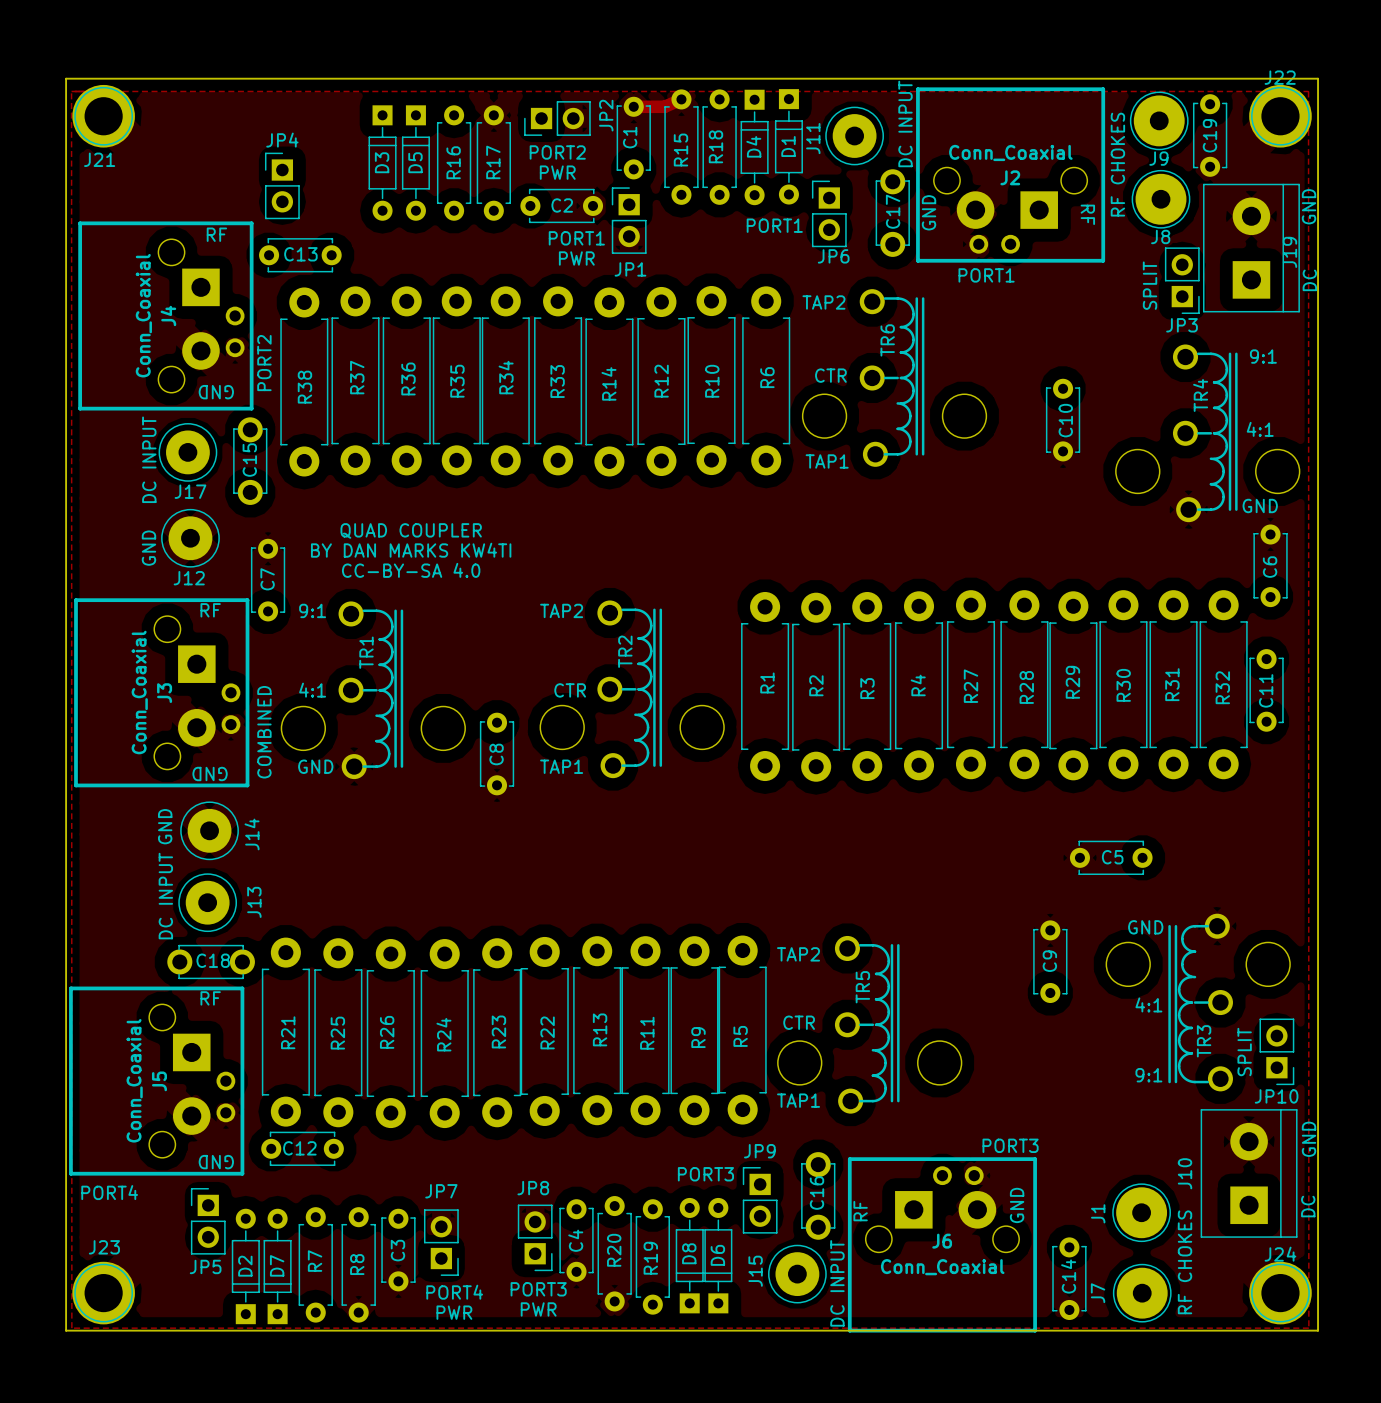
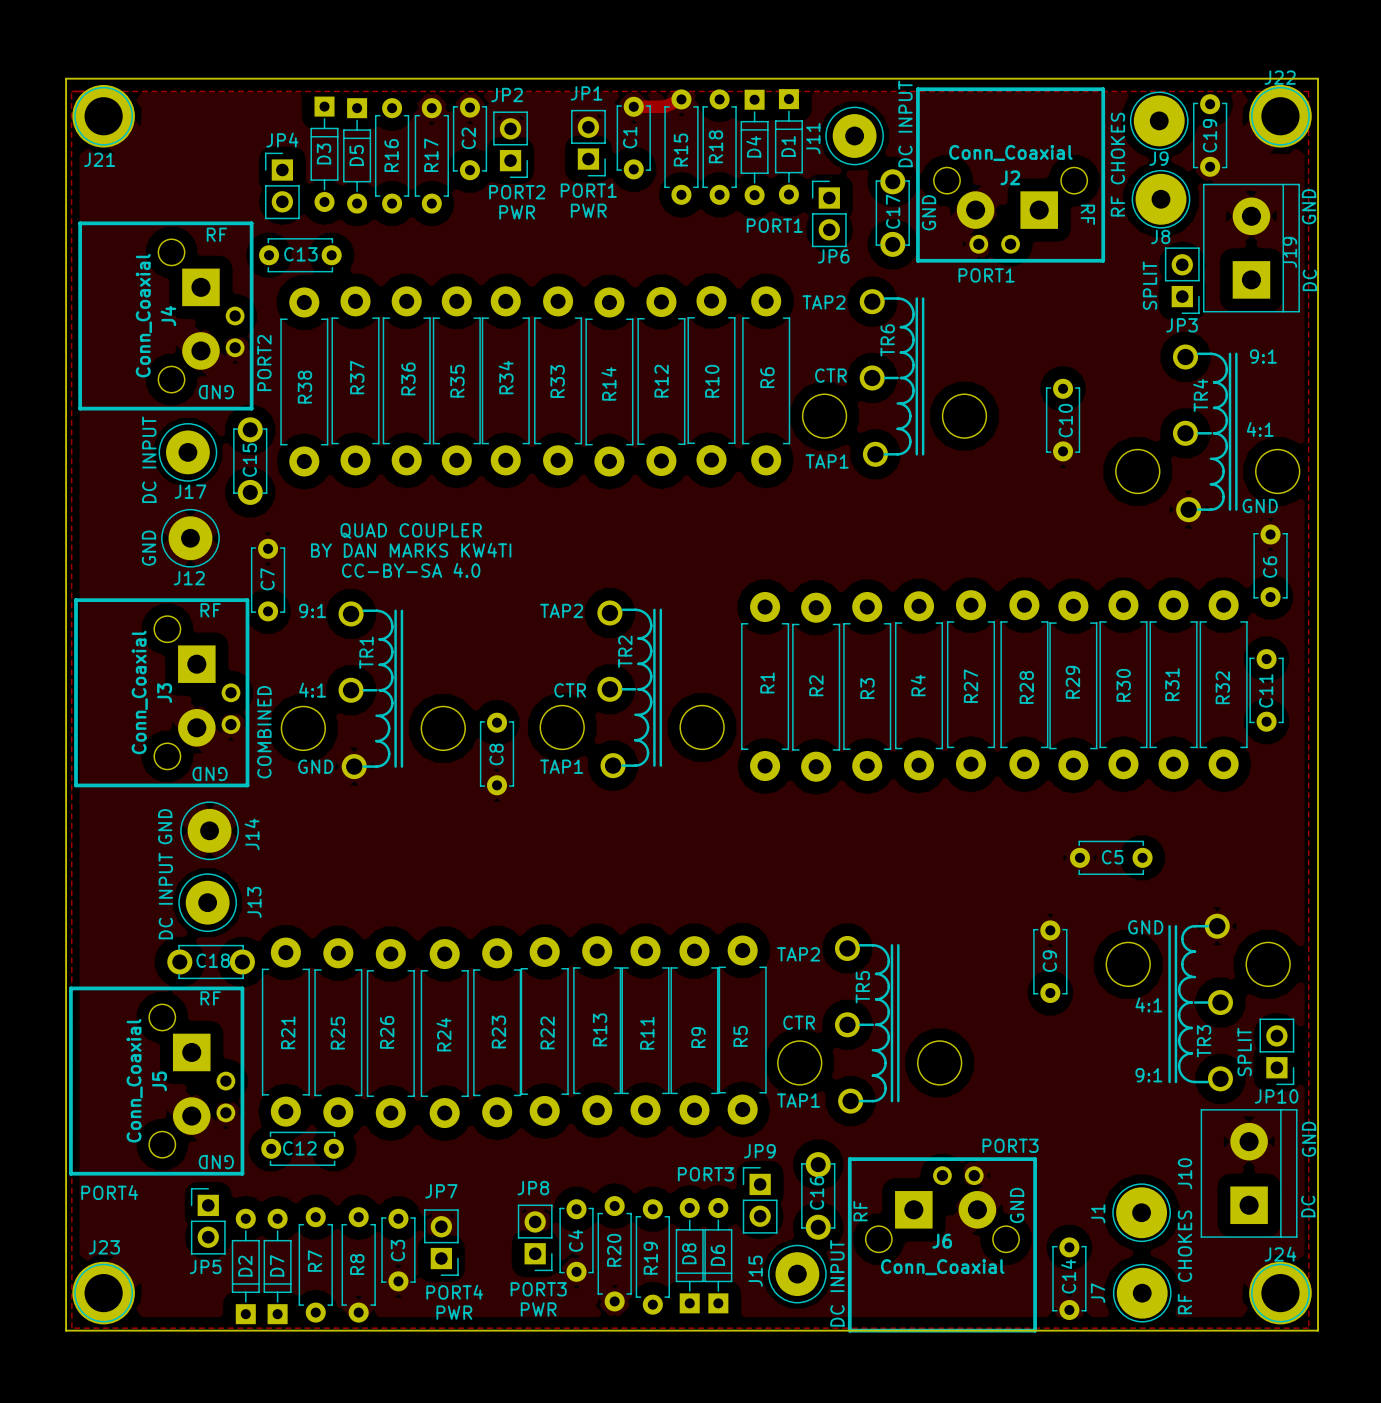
JP2 rotation: 0° (557, 118) -> 90° counterclockwise (510, 144)
JP2 position: (557, 118) -> (510, 144)
text position: PORT2 (557, 152) -> PORT2 (517, 192)
D3 position: (382, 163) -> (324, 154)
D5 position: (415, 163) -> (357, 155)
R16 position: (454, 163) -> (392, 155)
R17 position: (493, 163) -> (431, 155)
text: PWR (557, 172) -> none
C2 rotation: 0° (561, 205) -> 90° clockwise (469, 138)
C2 position: (561, 205) -> (469, 138)
text: none -> PWR (588, 210)
text: none -> PWR (517, 212)
JP1 rotation: 0° (629, 220) -> 180° (588, 143)
JP1 position: (629, 220) -> (588, 143)
text position: PORT1 (576, 238) -> PORT1 (588, 190)
text: PWR (576, 258) -> none

